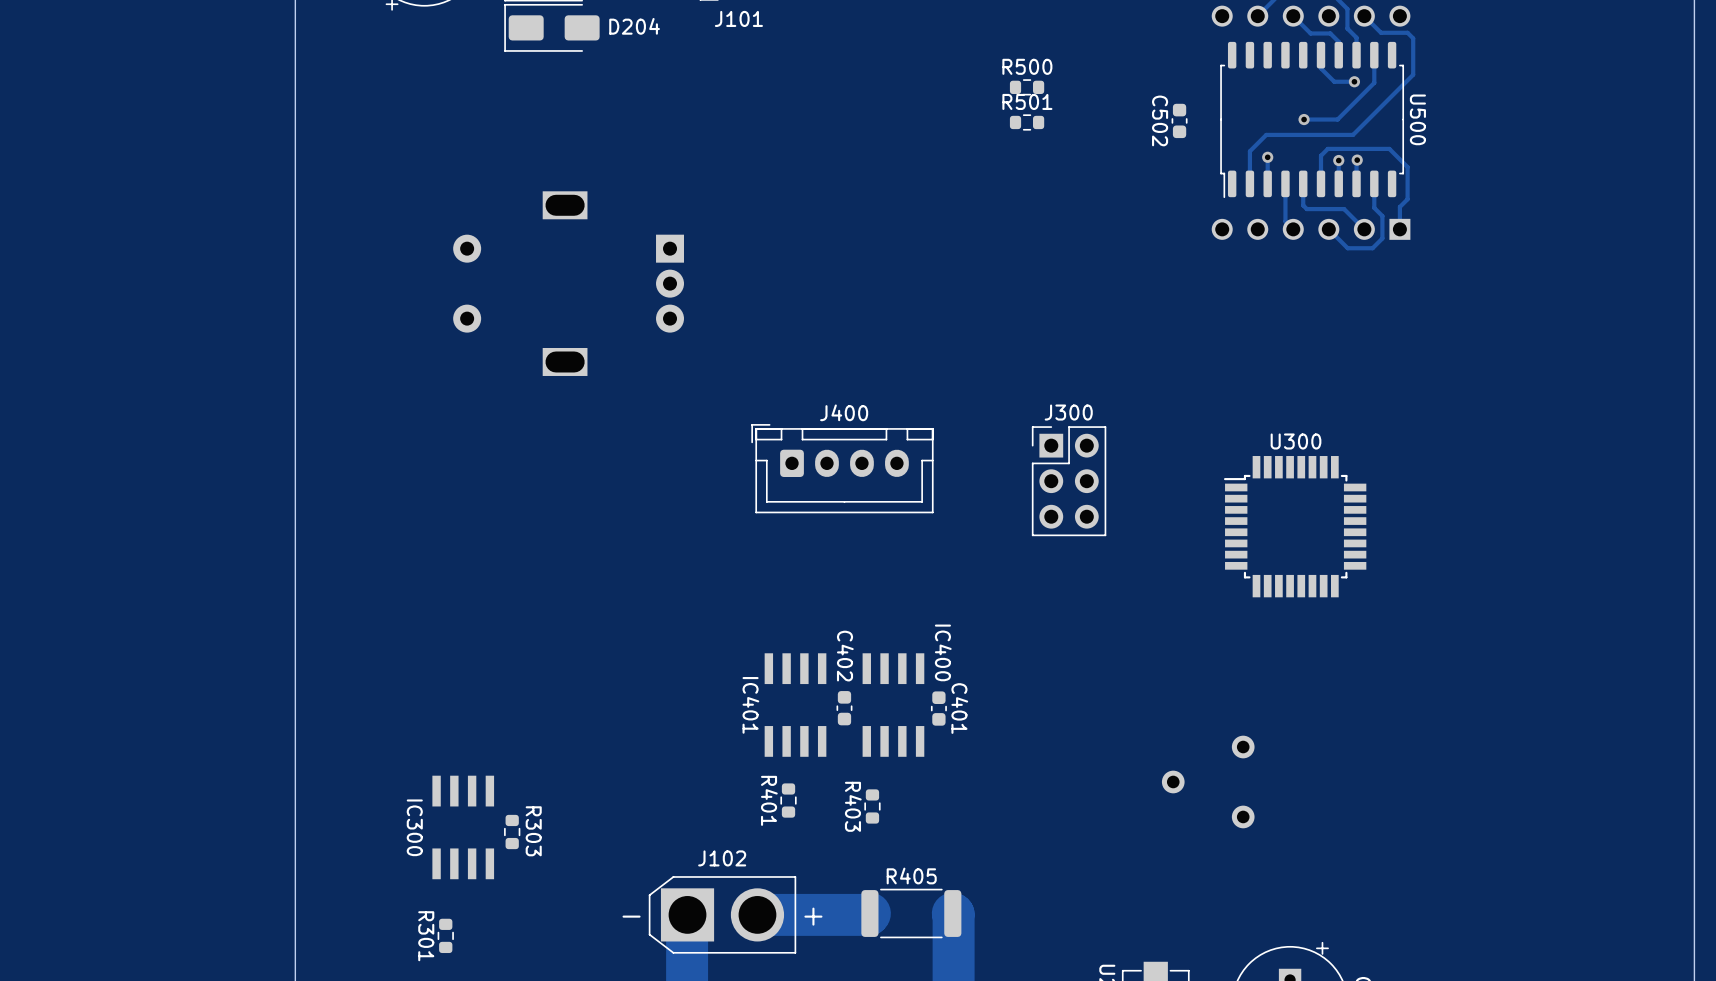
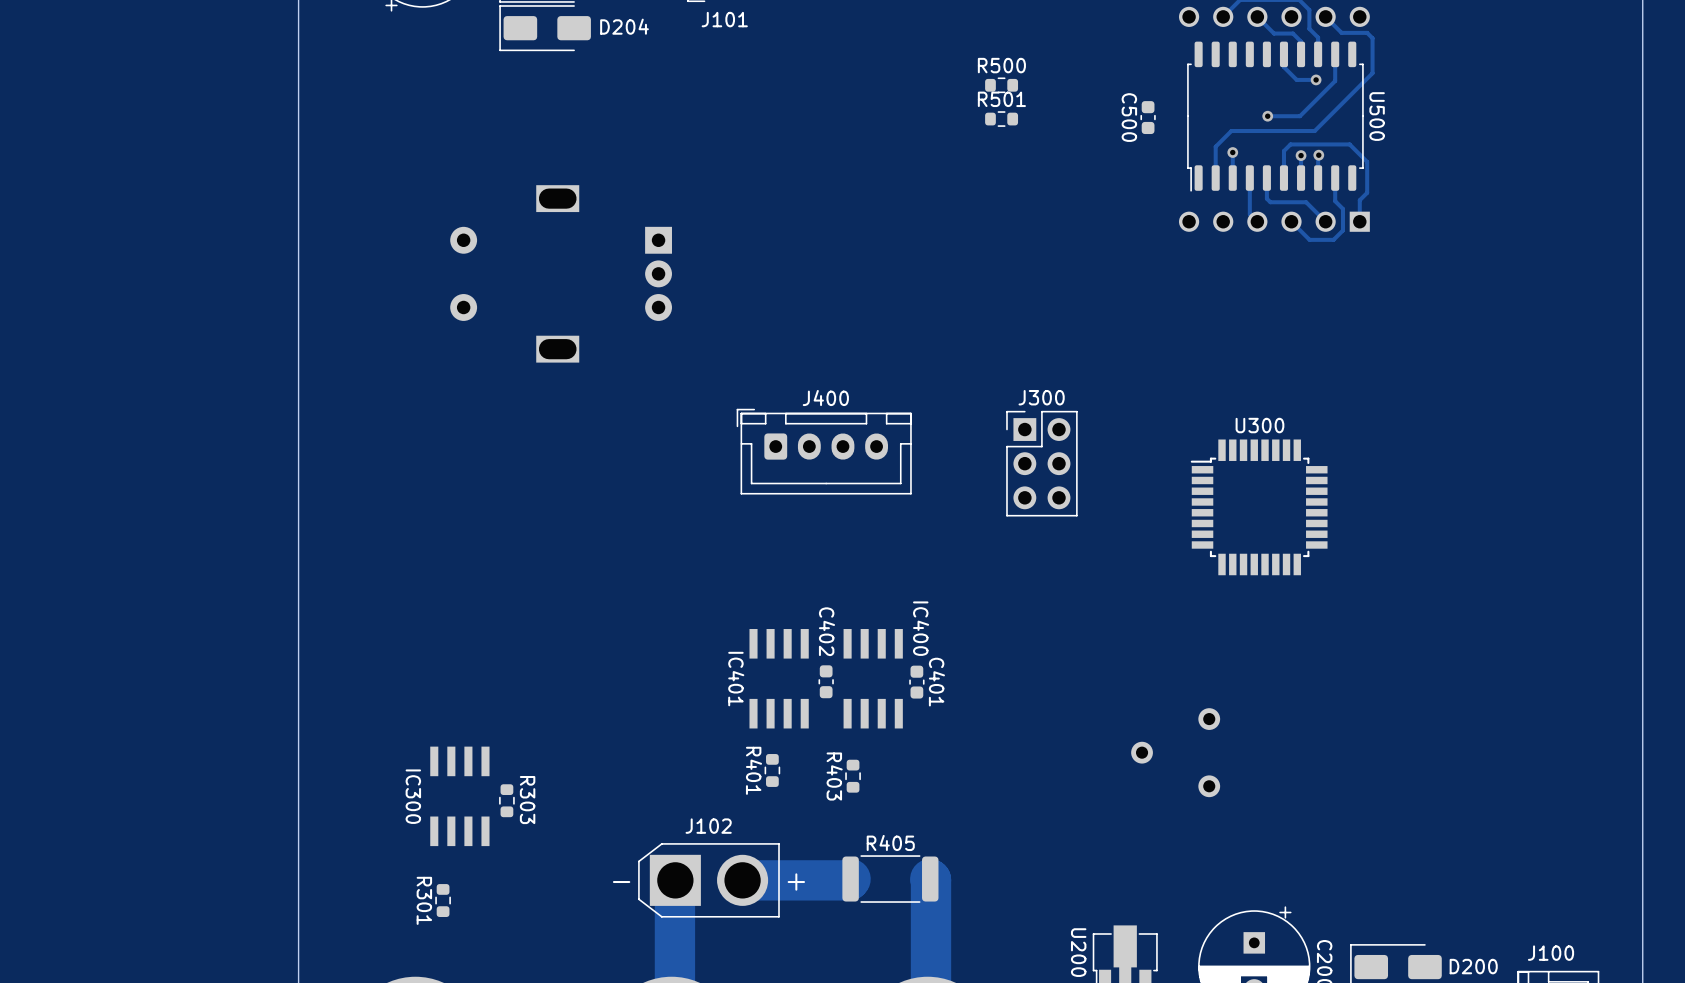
C502 name: C502 (1160, 120) -> C500 (1129, 117)

